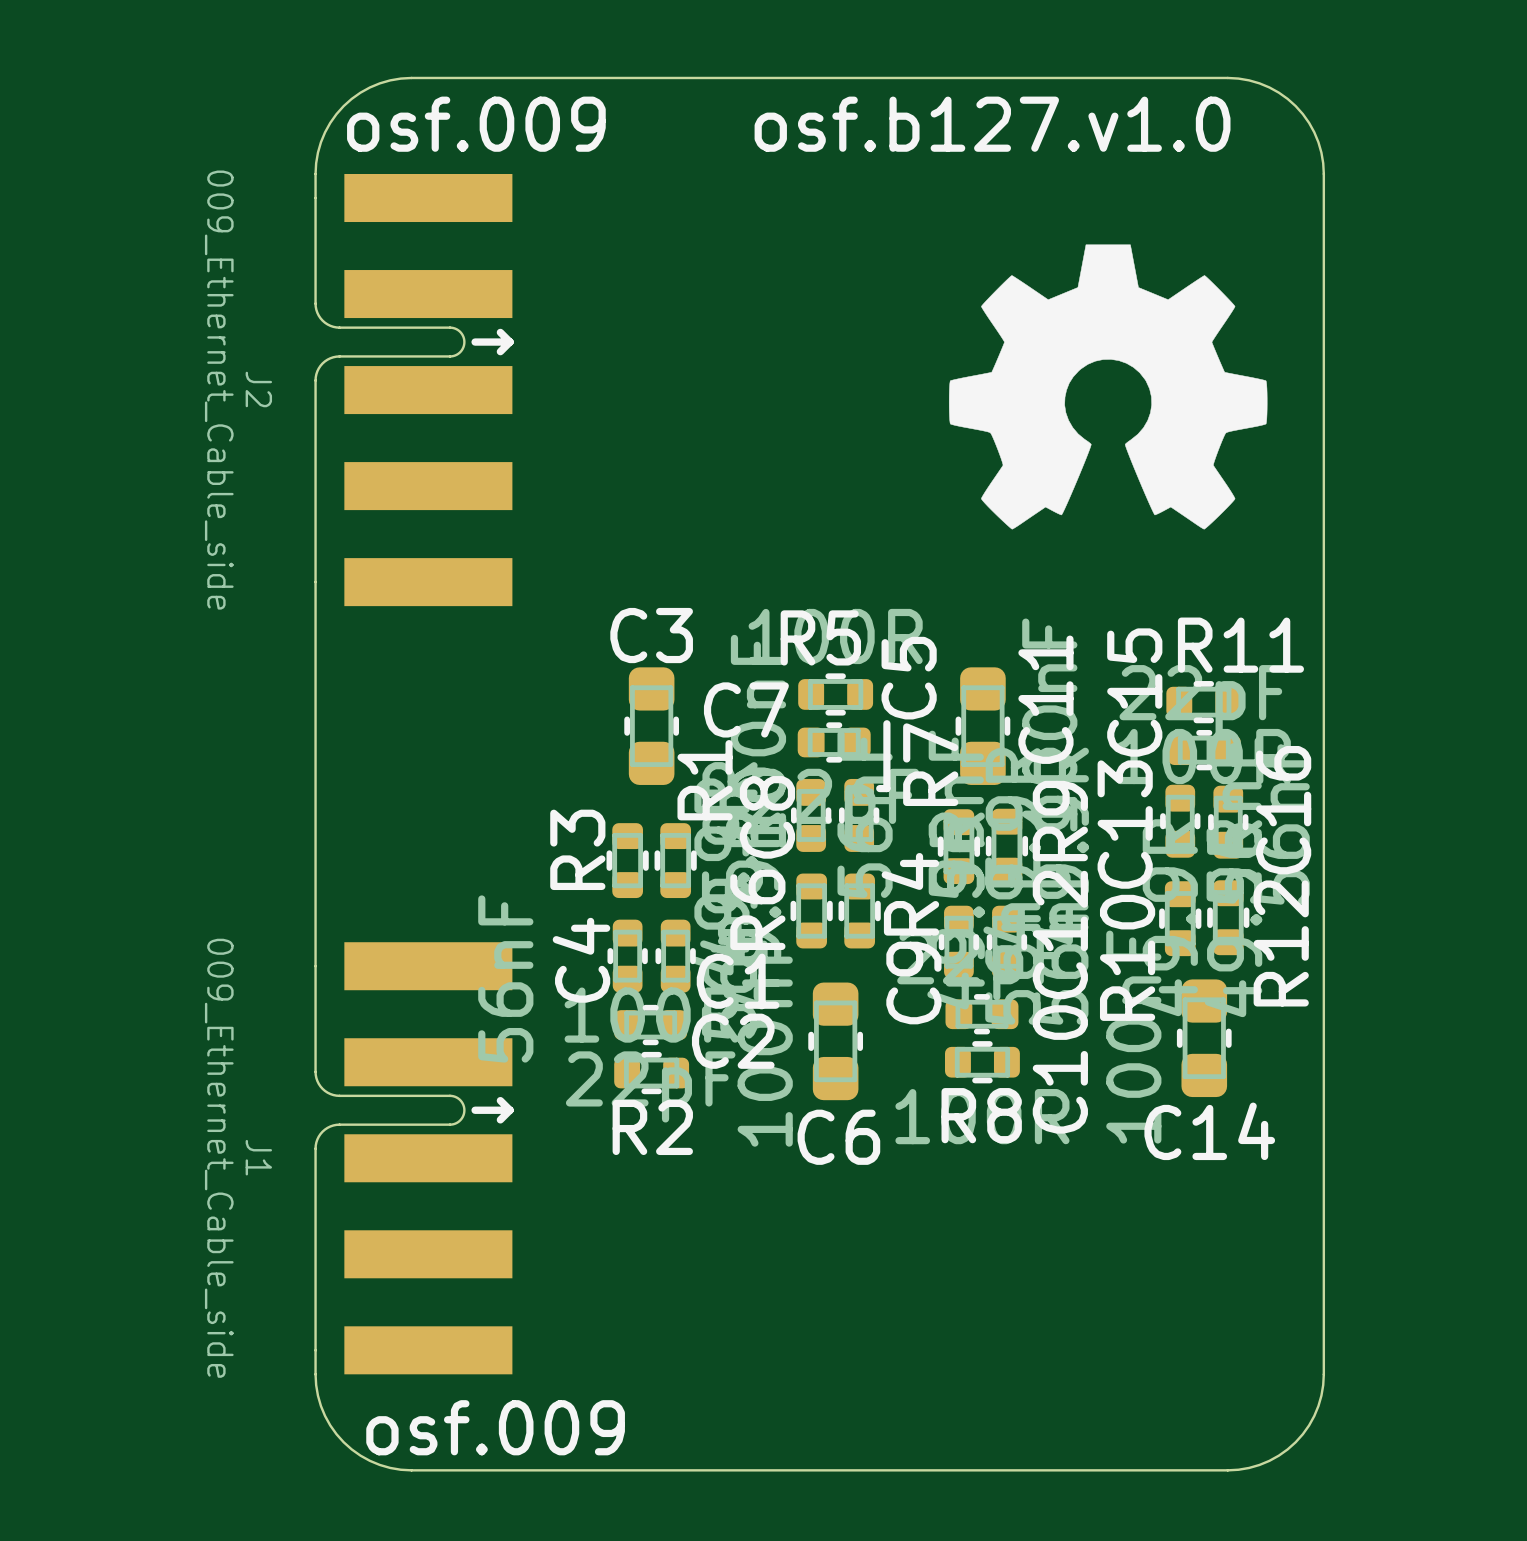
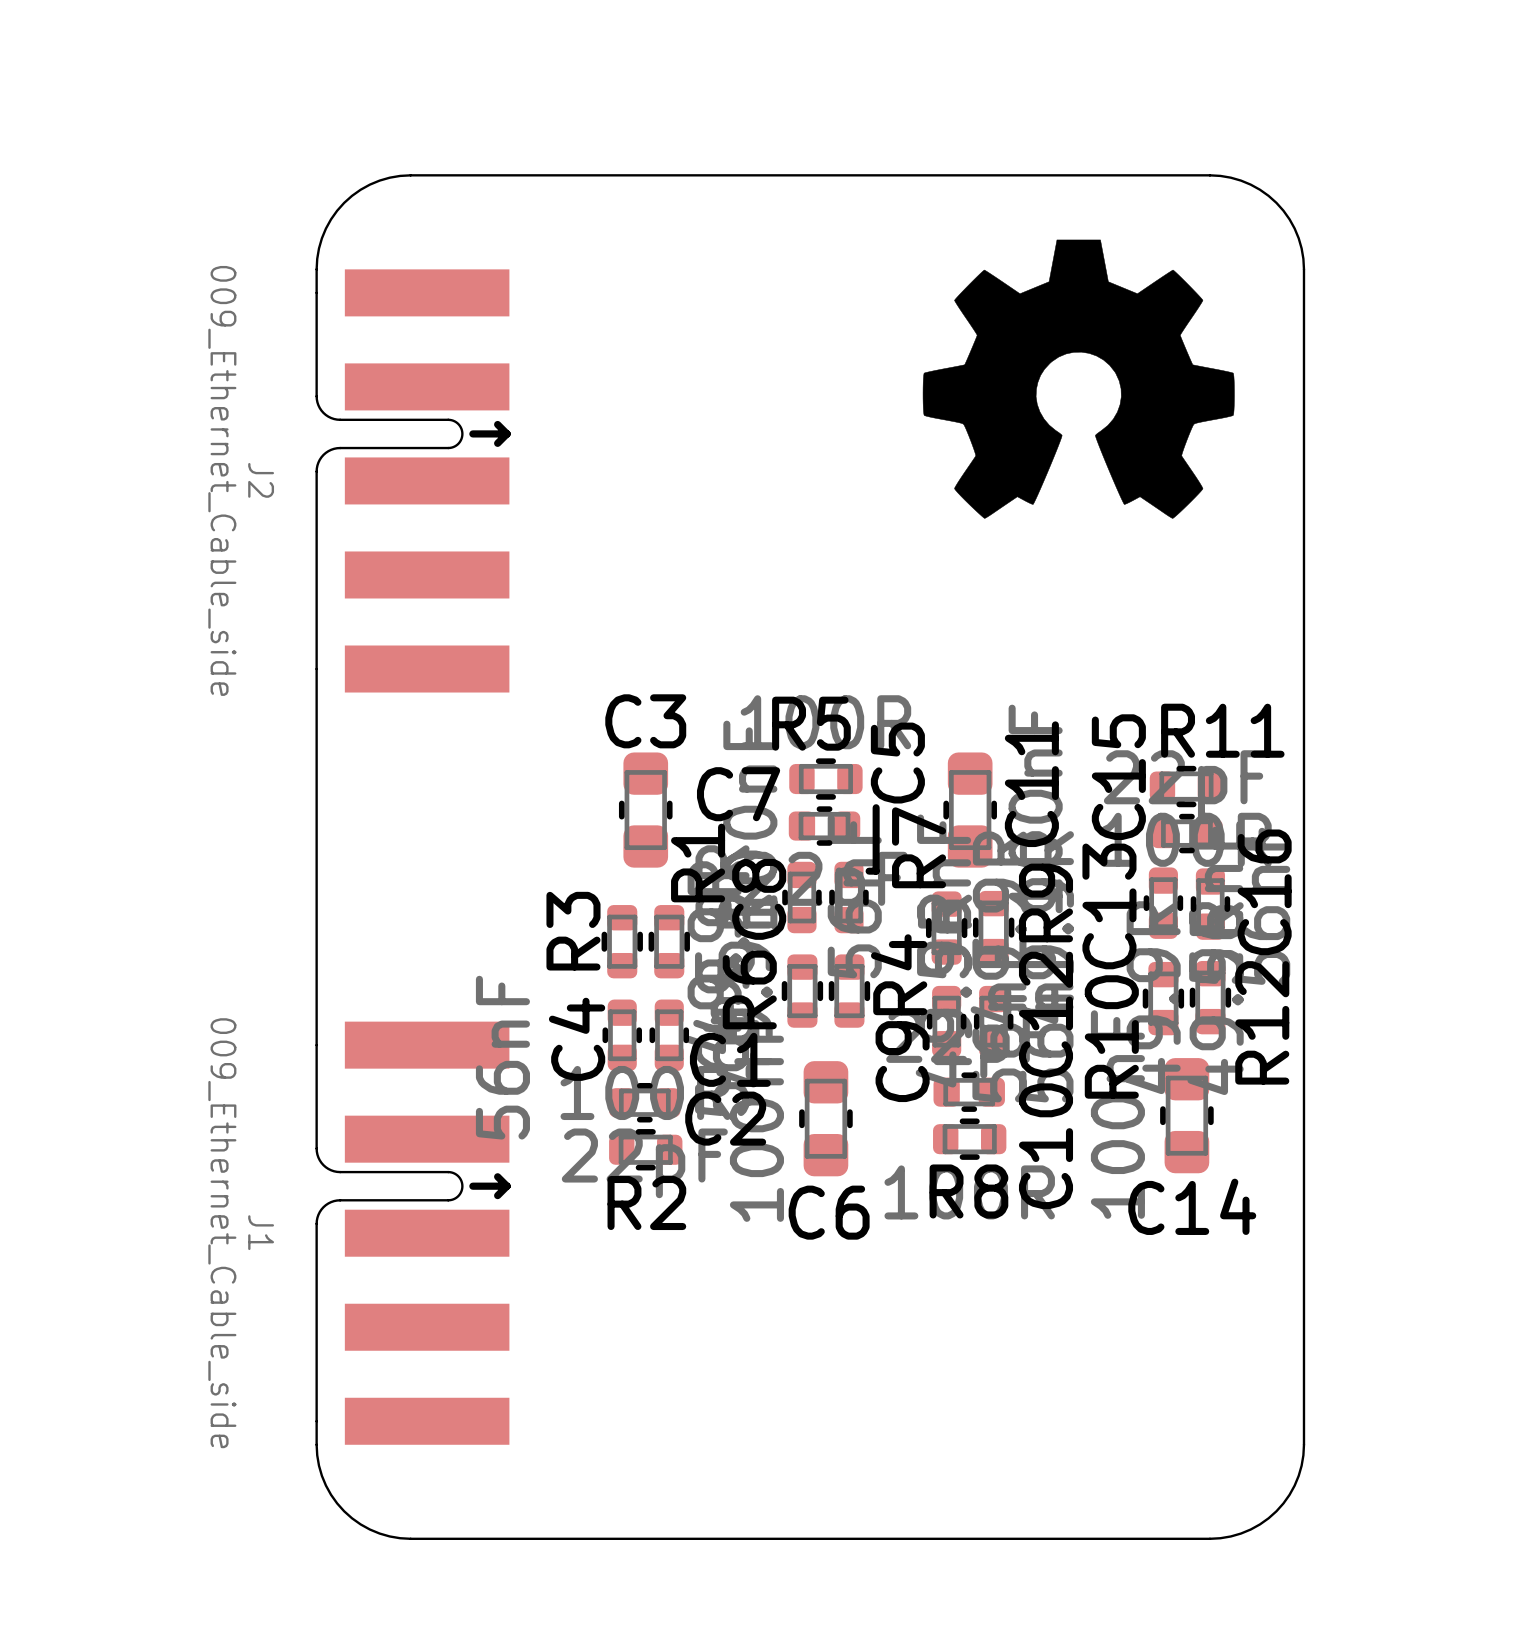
text: osf.009 (476, 124) -> none
text: osf.b127.v1.0 (992, 124) -> none
drawing position: (1108, 386) -> (1078, 379)
text: osf.009 (495, 1427) -> none

